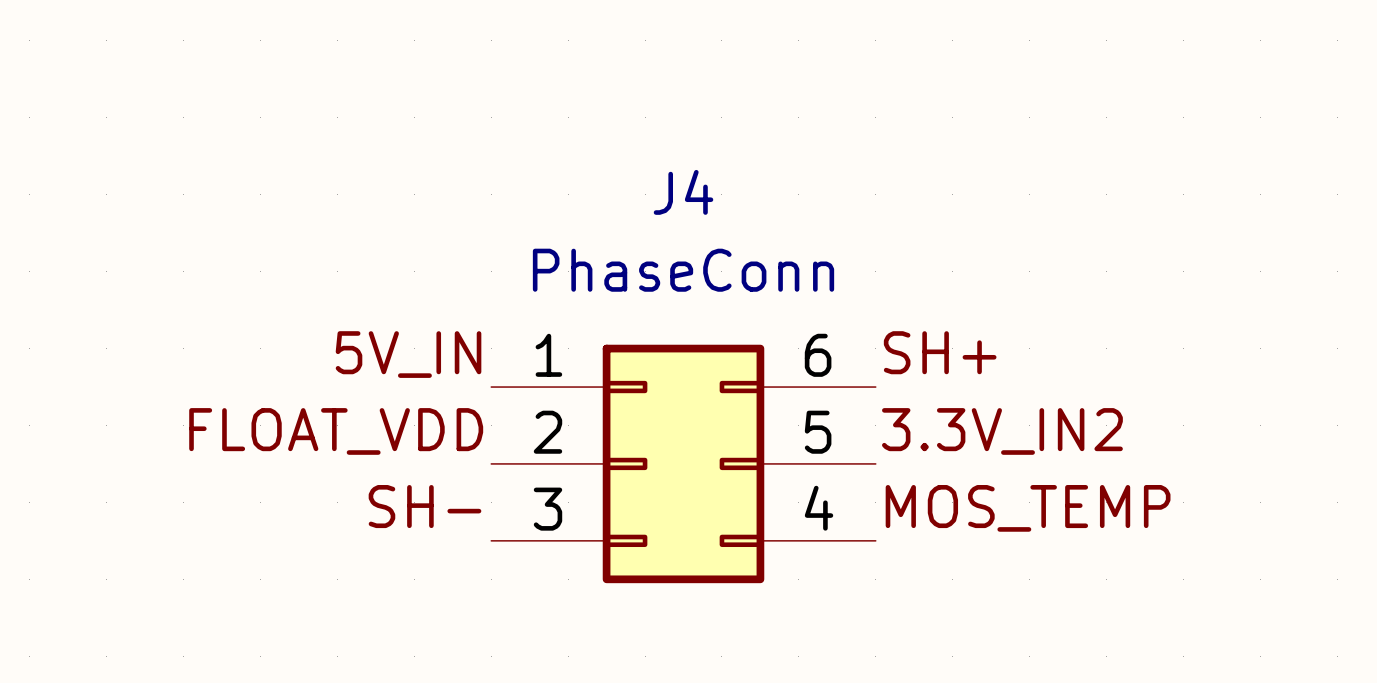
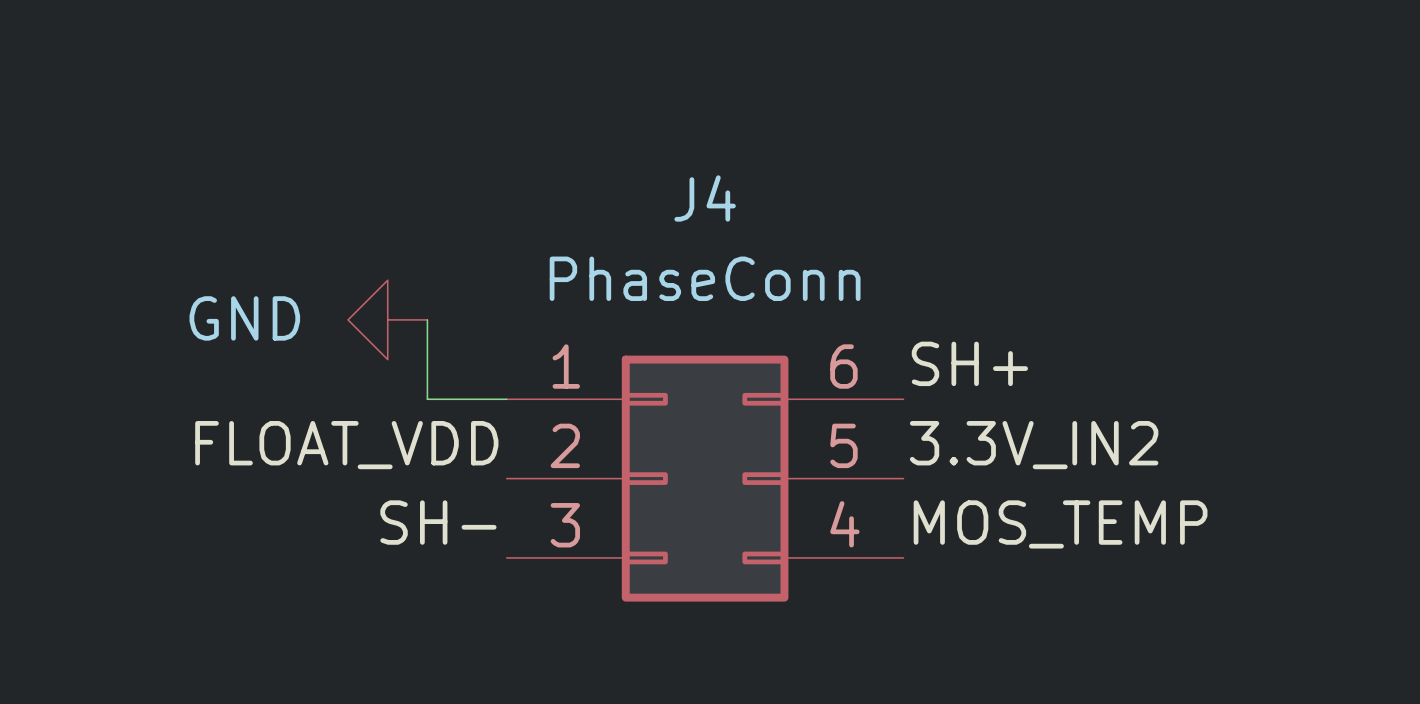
power symbol: none -> GND (387, 319)
wire: none -> (427, 319) (427, 399) (506, 399)
label: 5V_IN (408, 354) -> none

